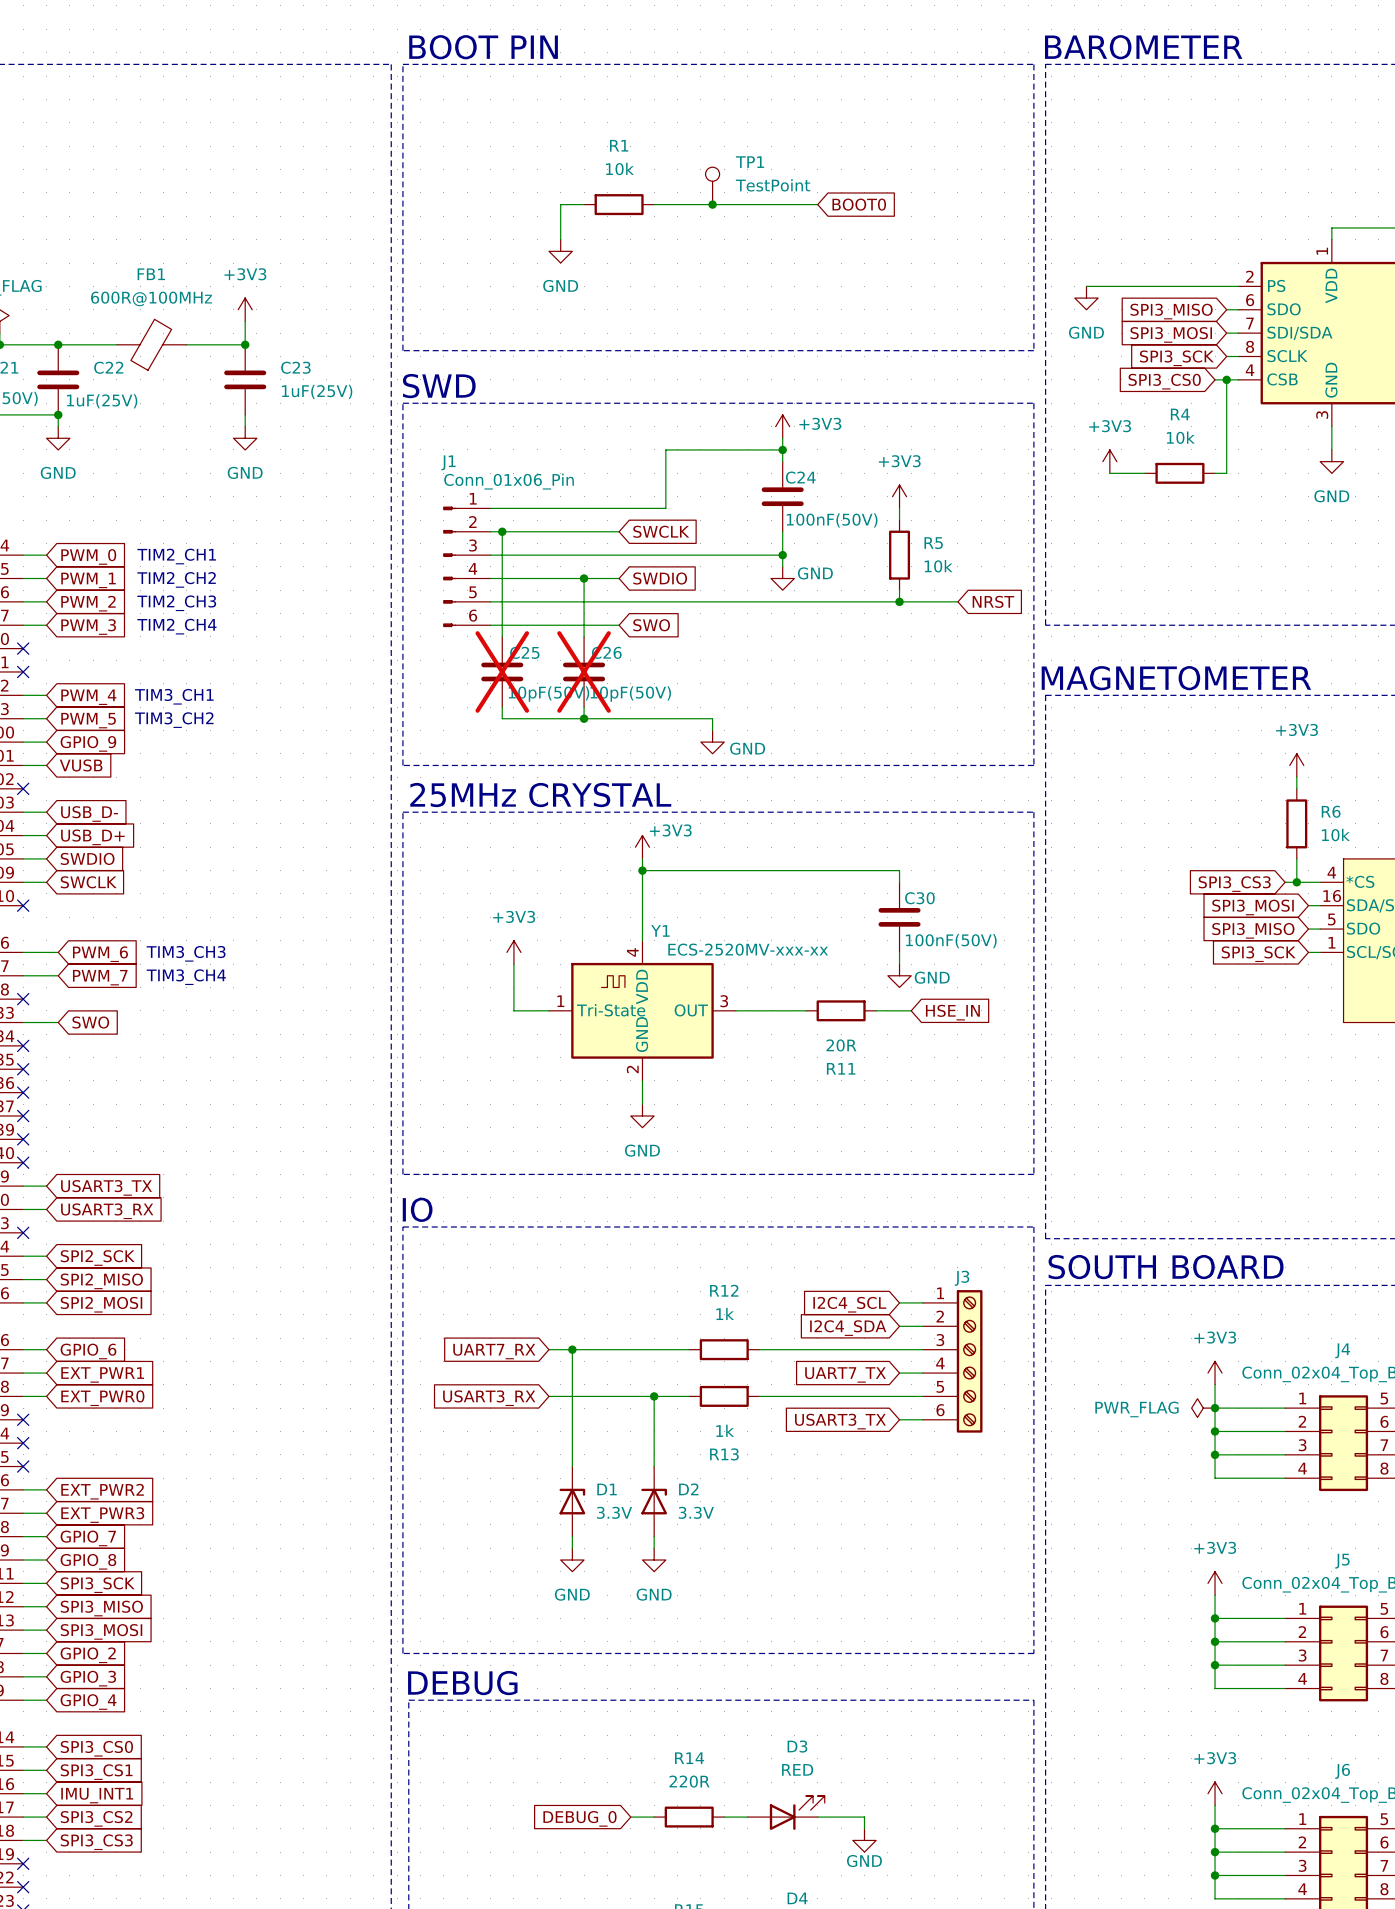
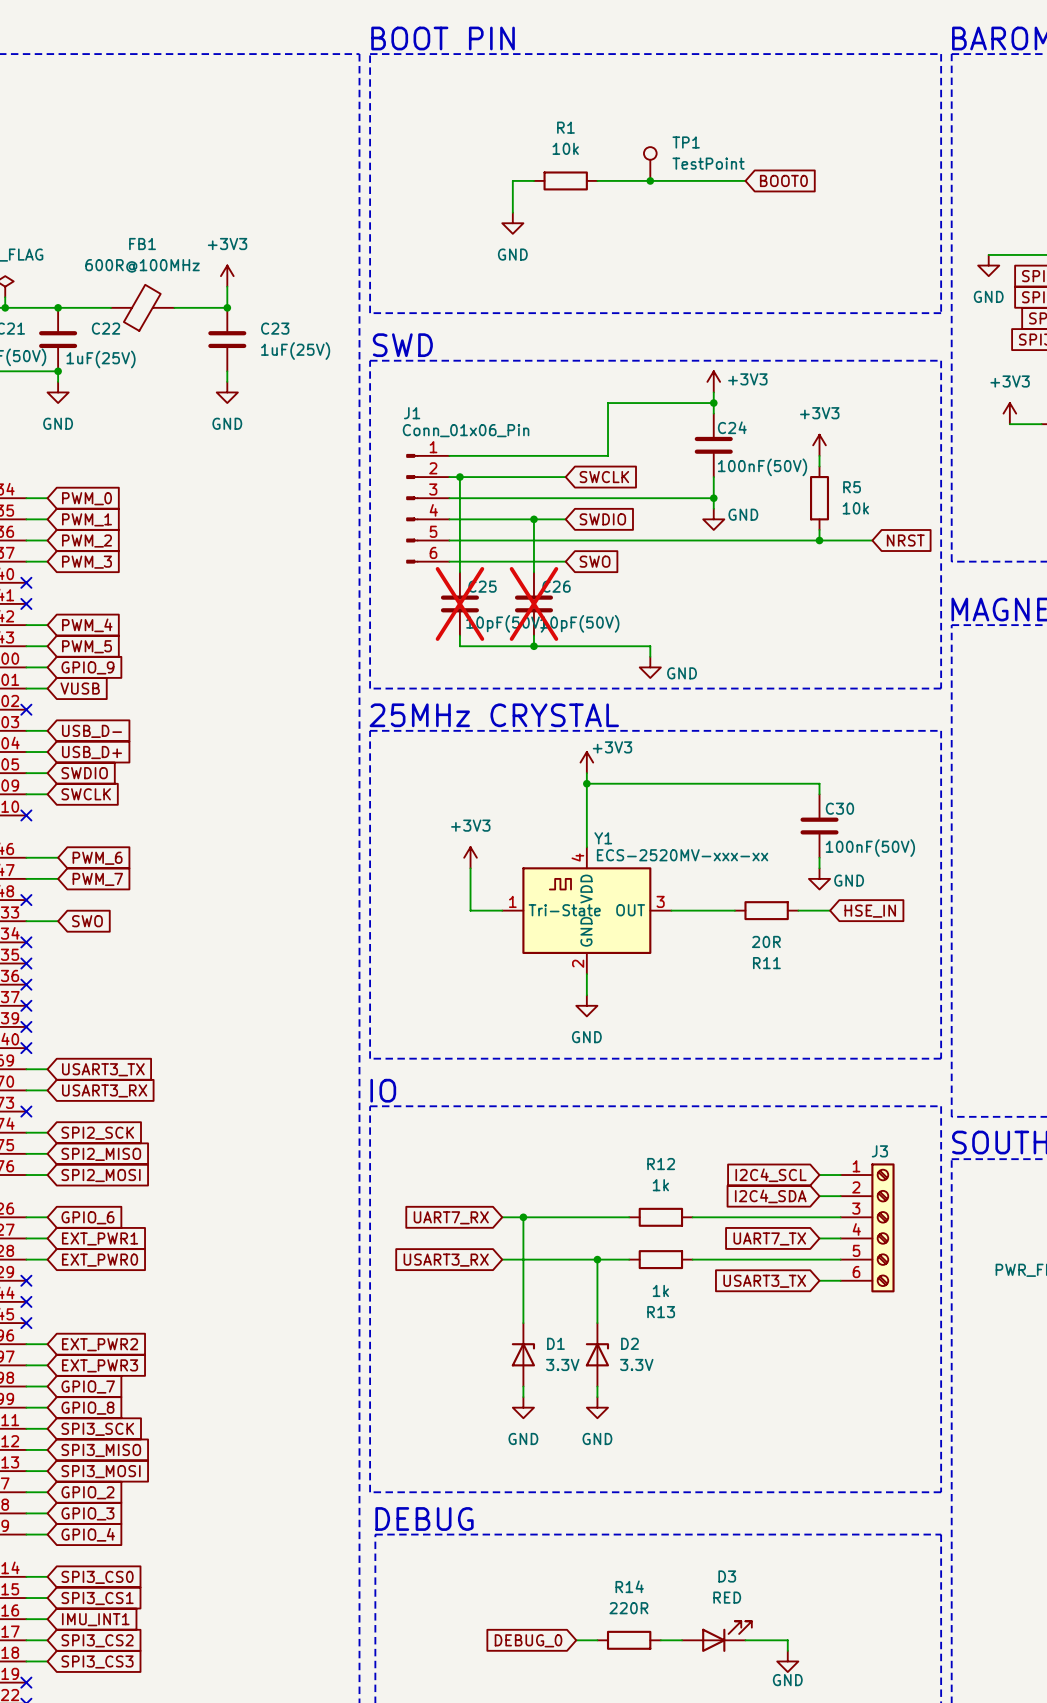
text: TIM2_CH1 (176, 556) -> none
text: TIM2_CH2 (176, 579) -> none
text: TIM2_CH3 (176, 603) -> none
text: TIM2_CH4 (176, 626) -> none
text: TIM3_CH1 (174, 696) -> none
text: TIM3_CH2 (174, 720) -> none
text: TIM3_CH3 (186, 953) -> none
text: TIM3_CH4 (186, 977) -> none

